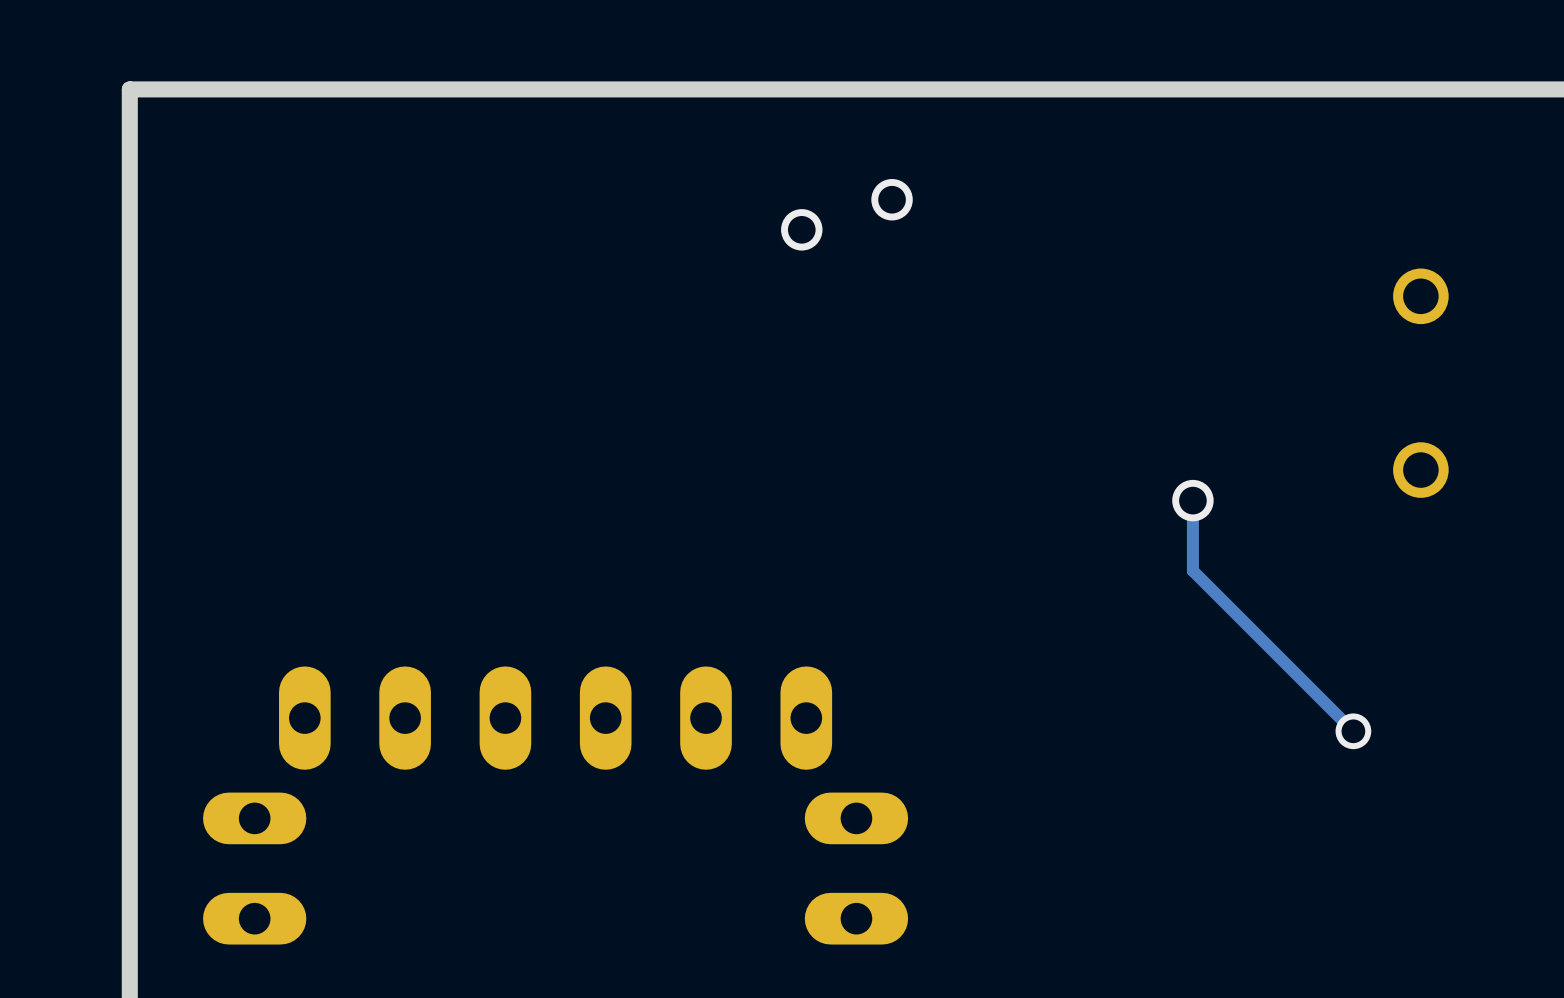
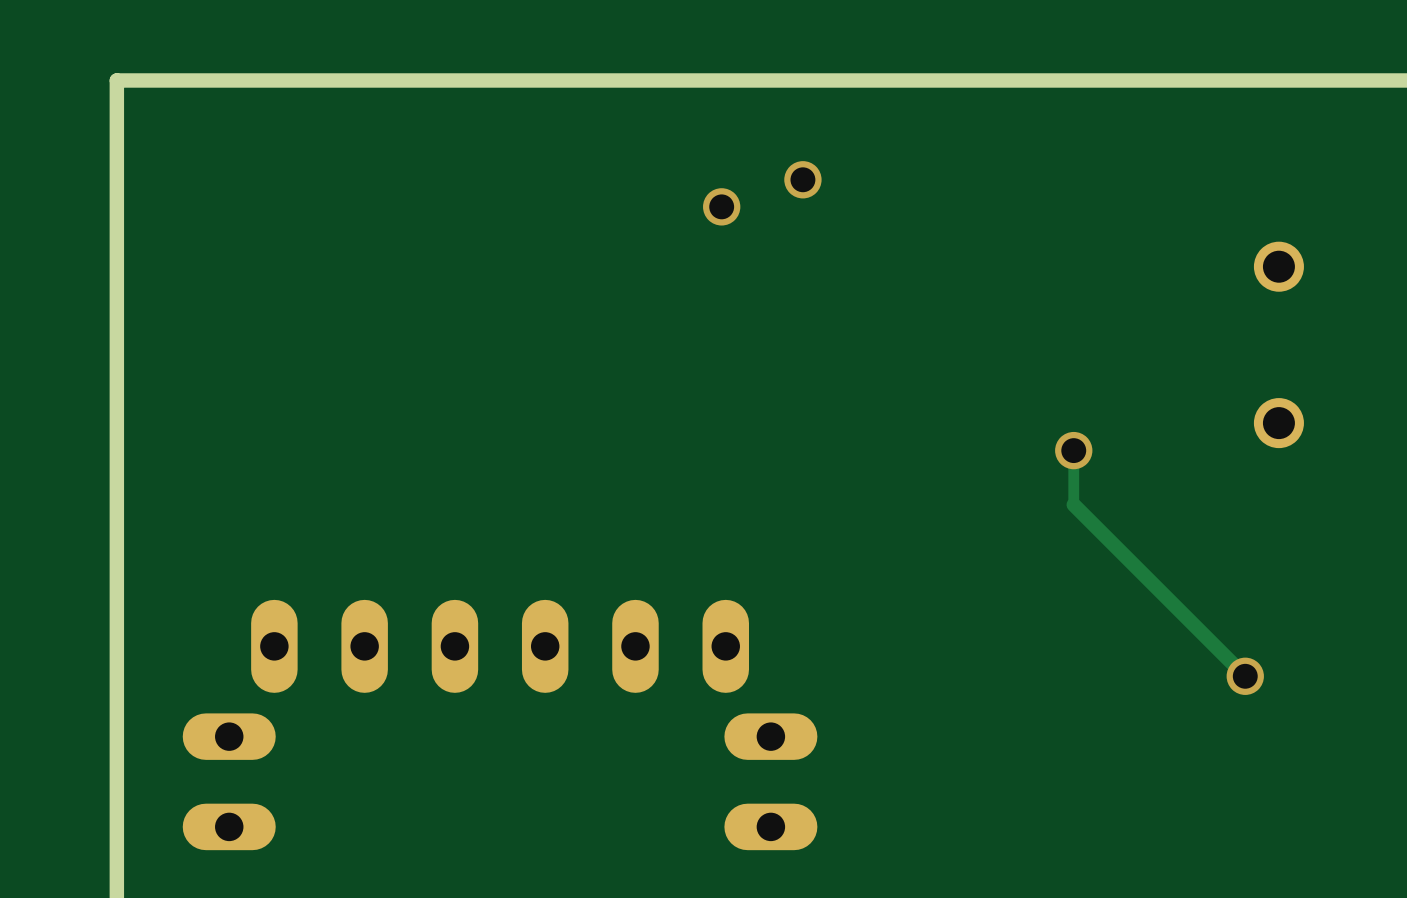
track: (1192, 560) (1192, 570) (1353, 731) -> (1073, 504) (1245, 676)
via position: (1353, 731) -> (1245, 676)

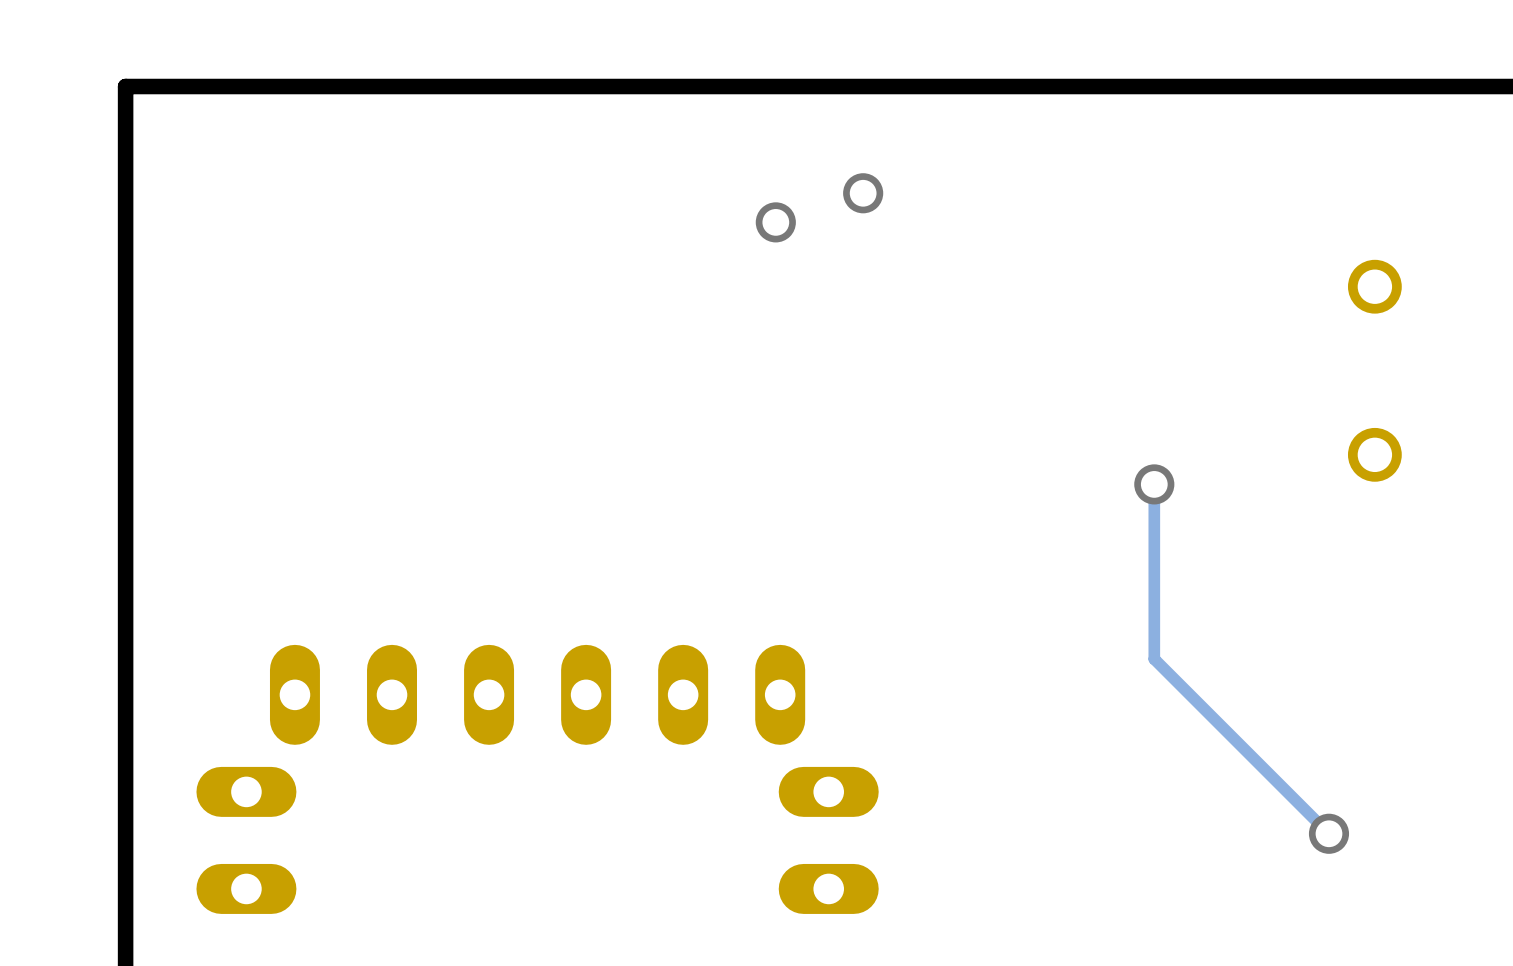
track: (1073, 504) (1245, 676) -> (1154, 542) (1154, 659) (1328, 833)
via position: (1245, 676) -> (1328, 833)

